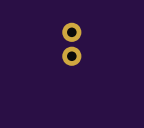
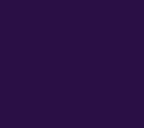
via: (71, 32) -> none
via: (71, 56) -> none

